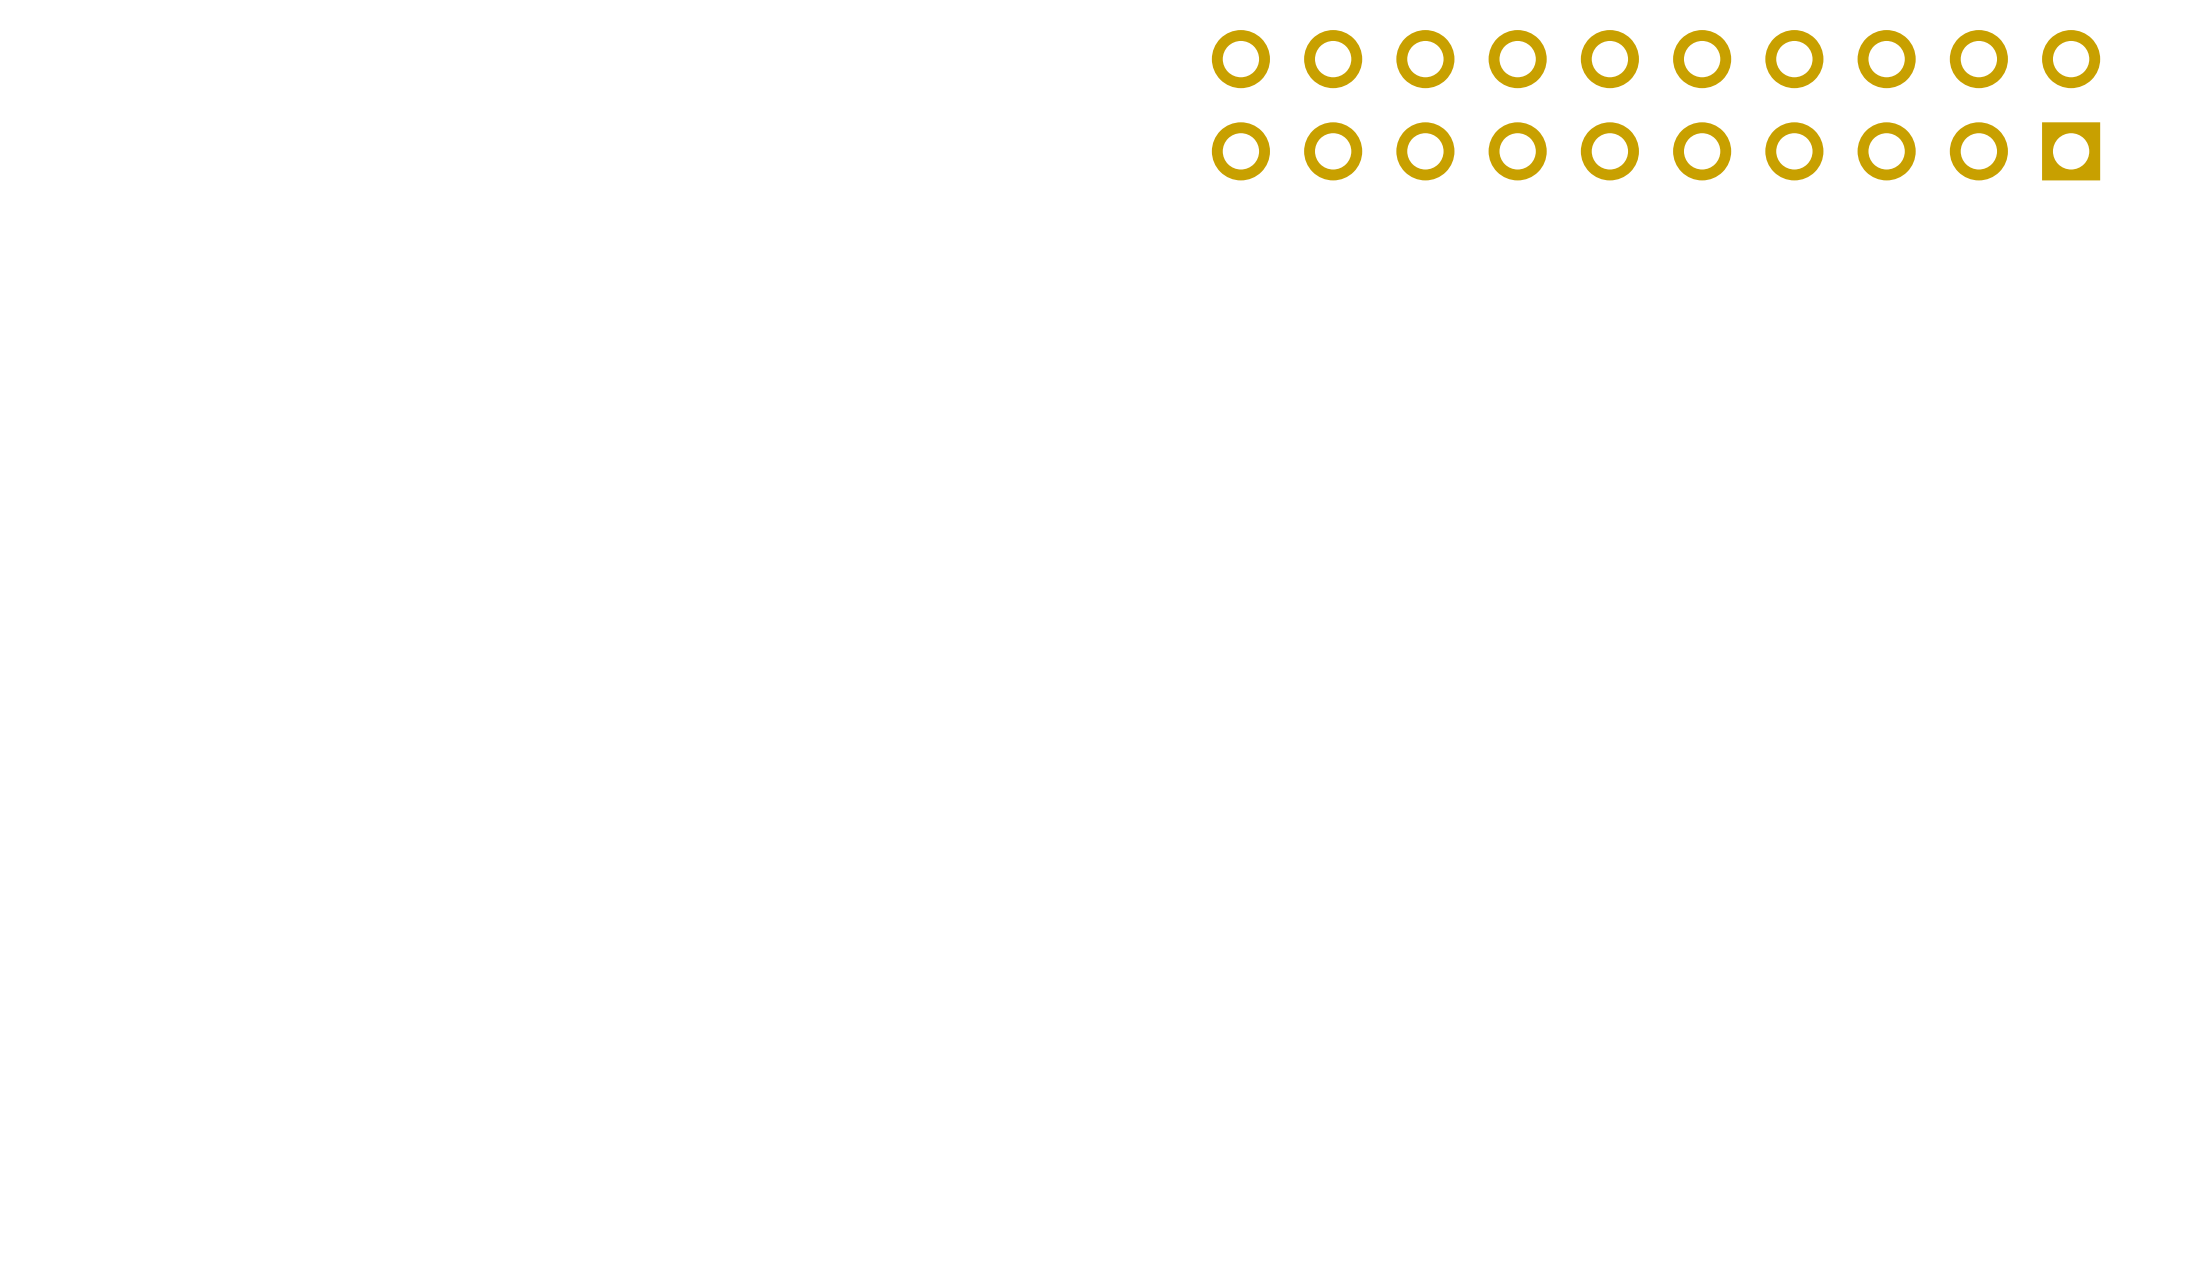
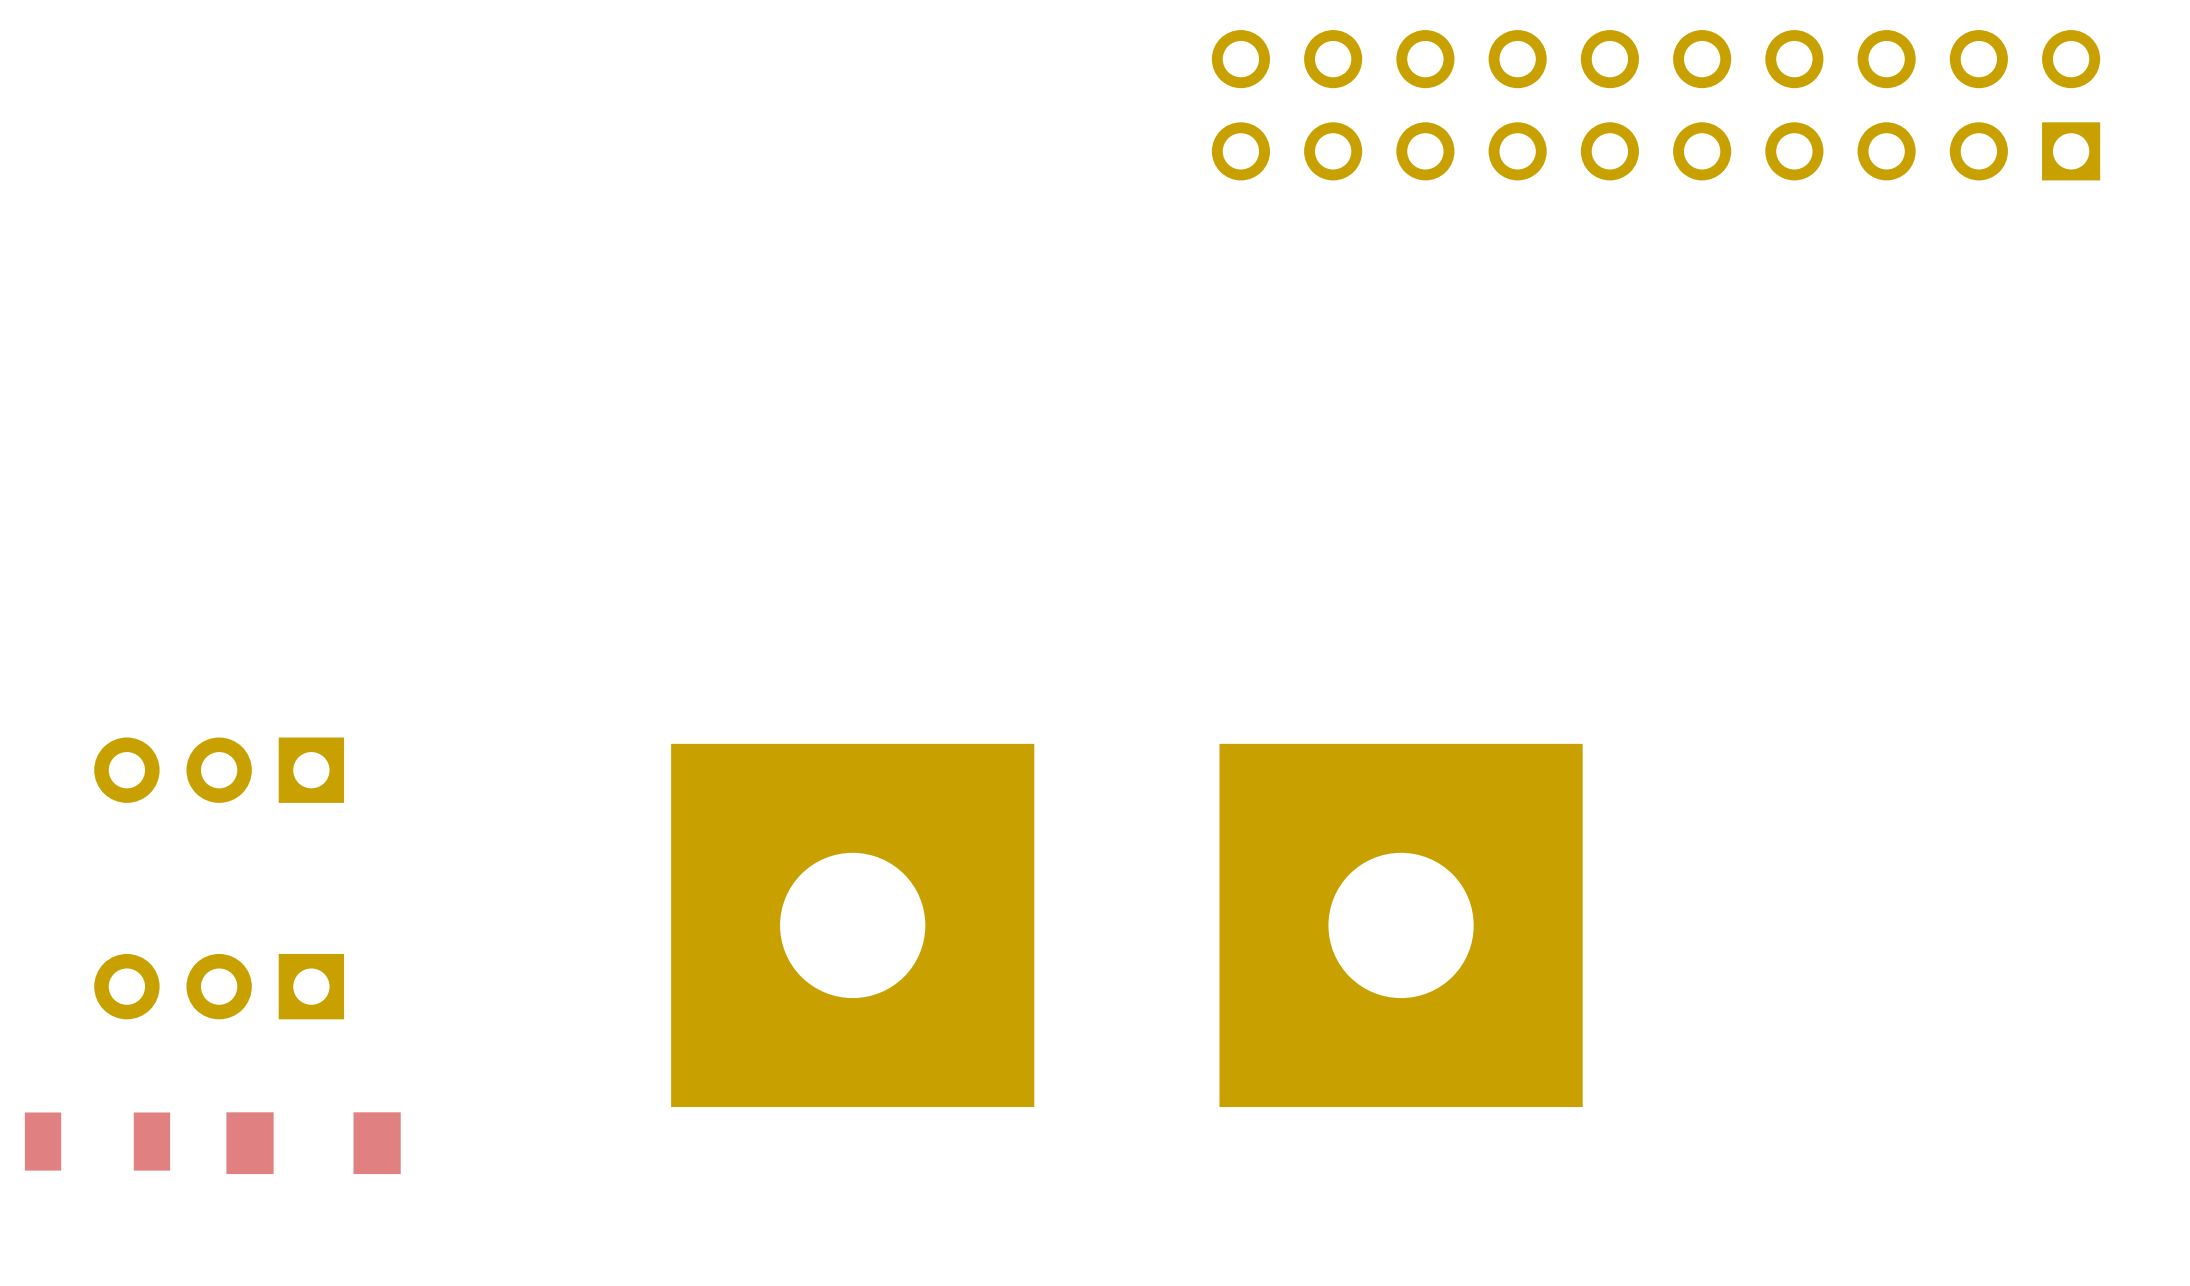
part: none -> (219, 770)
part: none -> (852, 925)
part: none -> (1401, 925)
part: none -> (219, 986)
part: none -> (97, 1141)
part: none -> (313, 1143)

